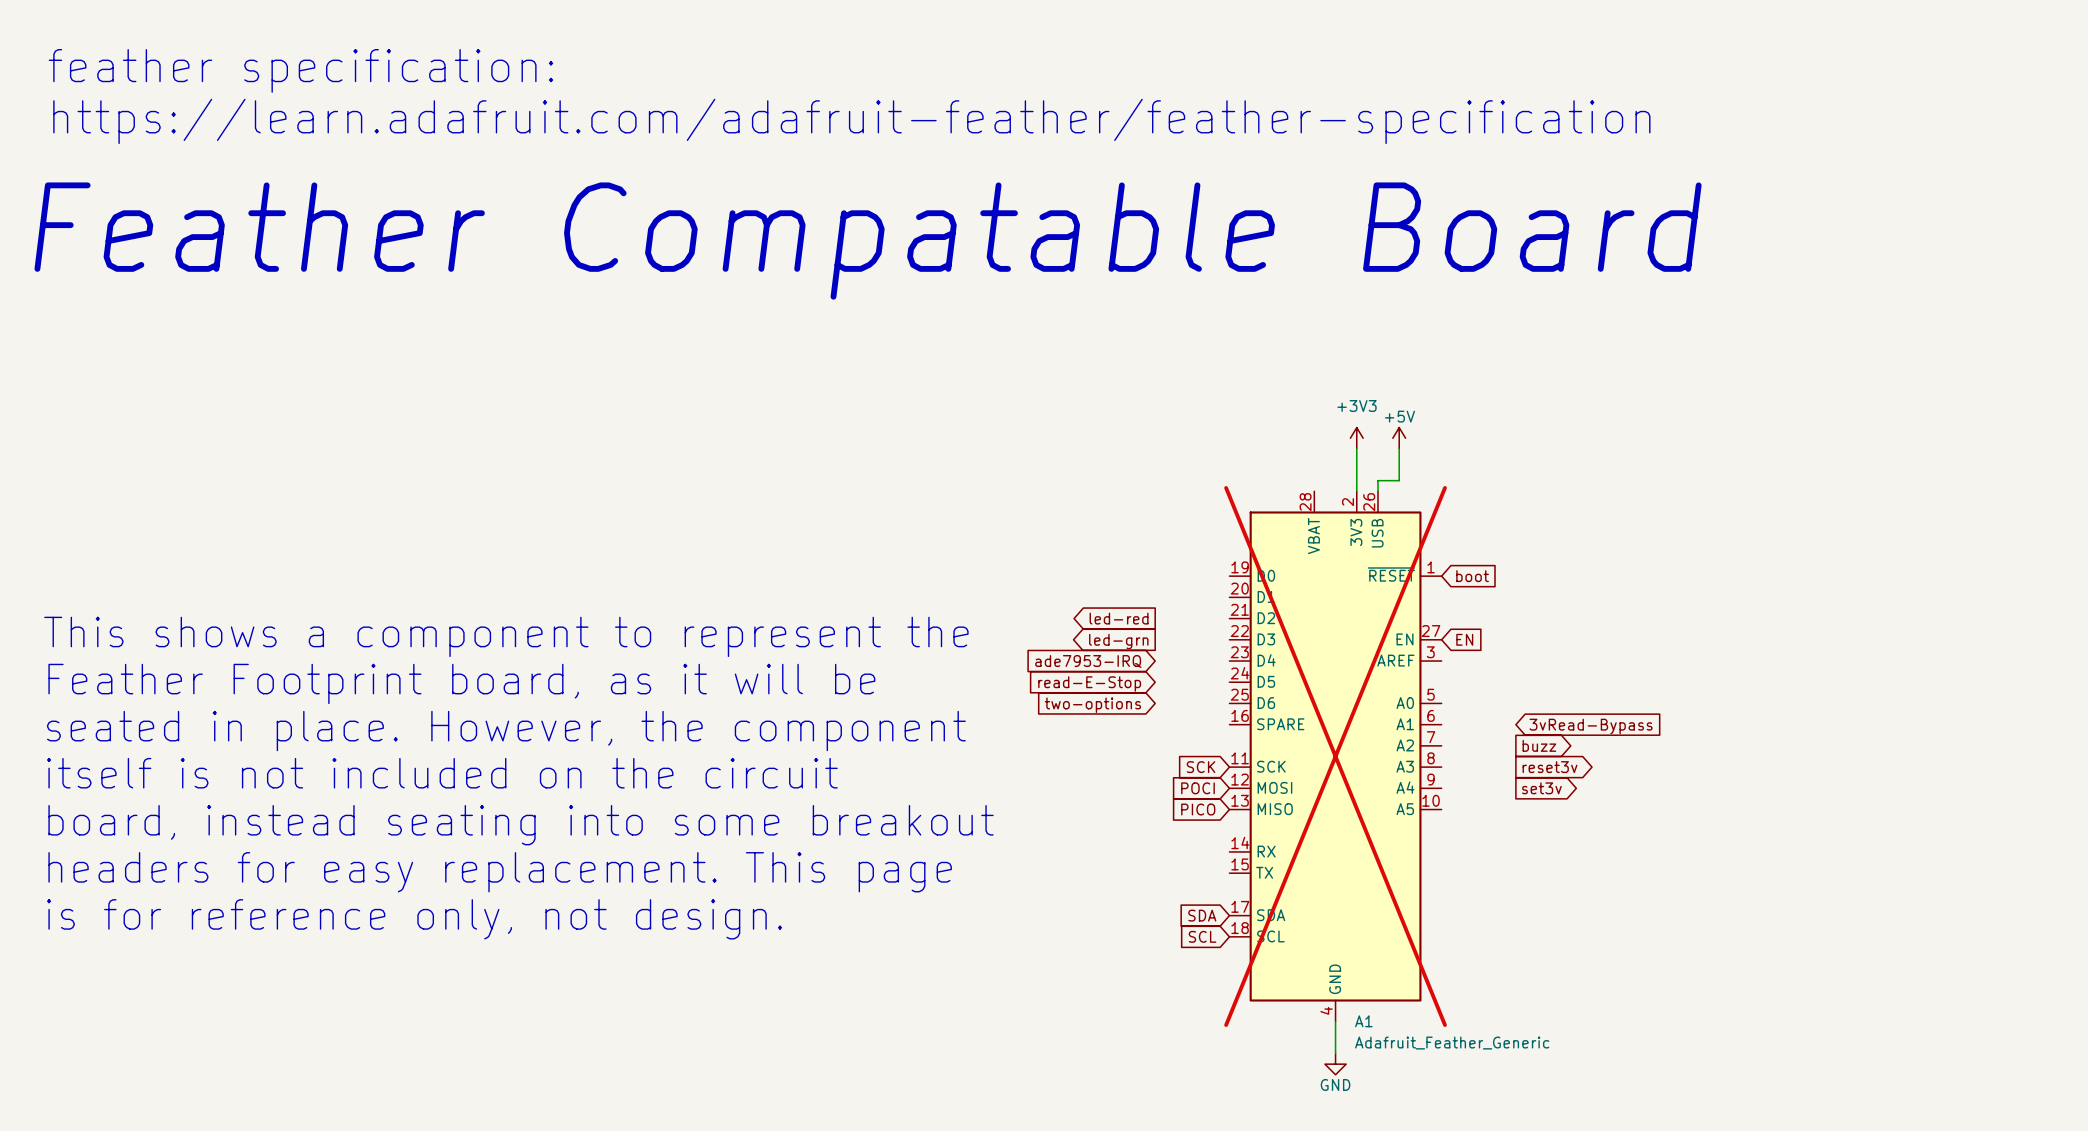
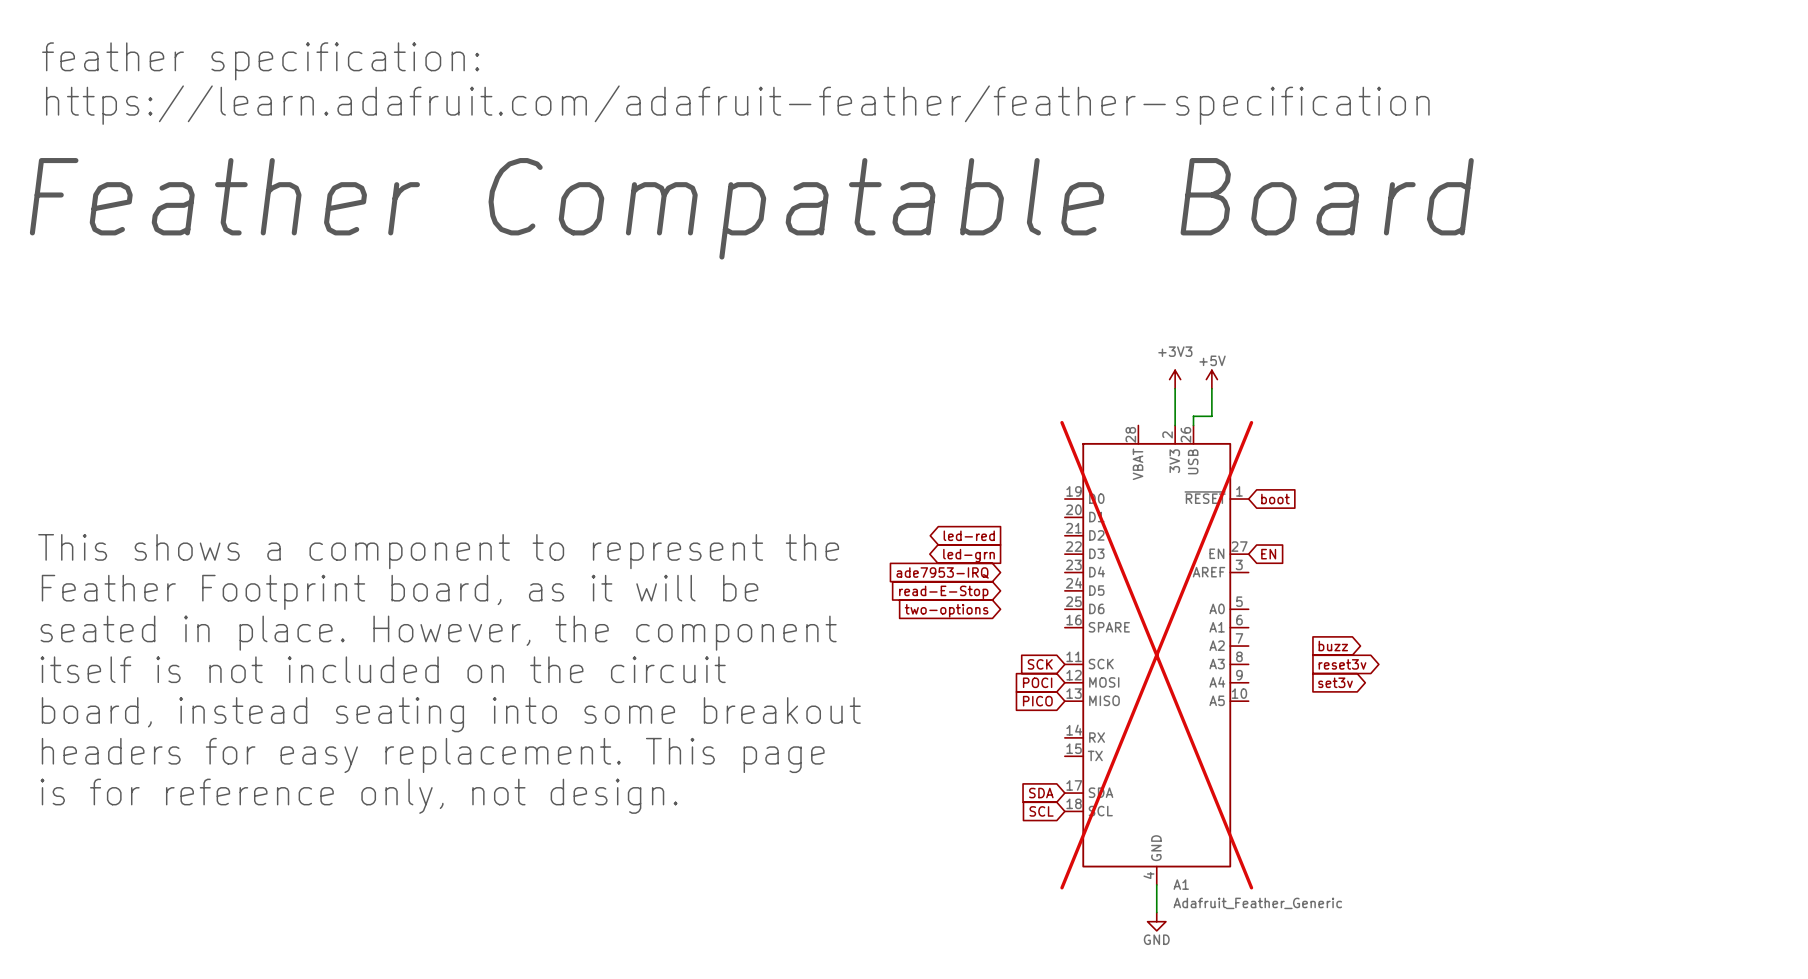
global label: 3vRead-Bypass (1591, 726) -> none

